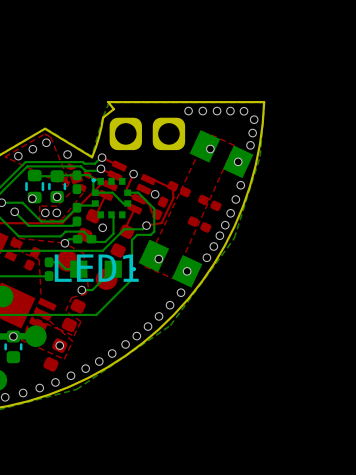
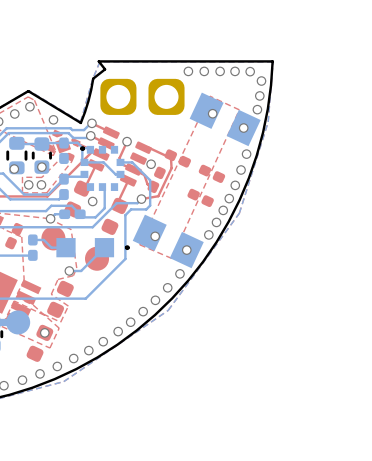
LED1 name: LED1 (96, 268) -> none

